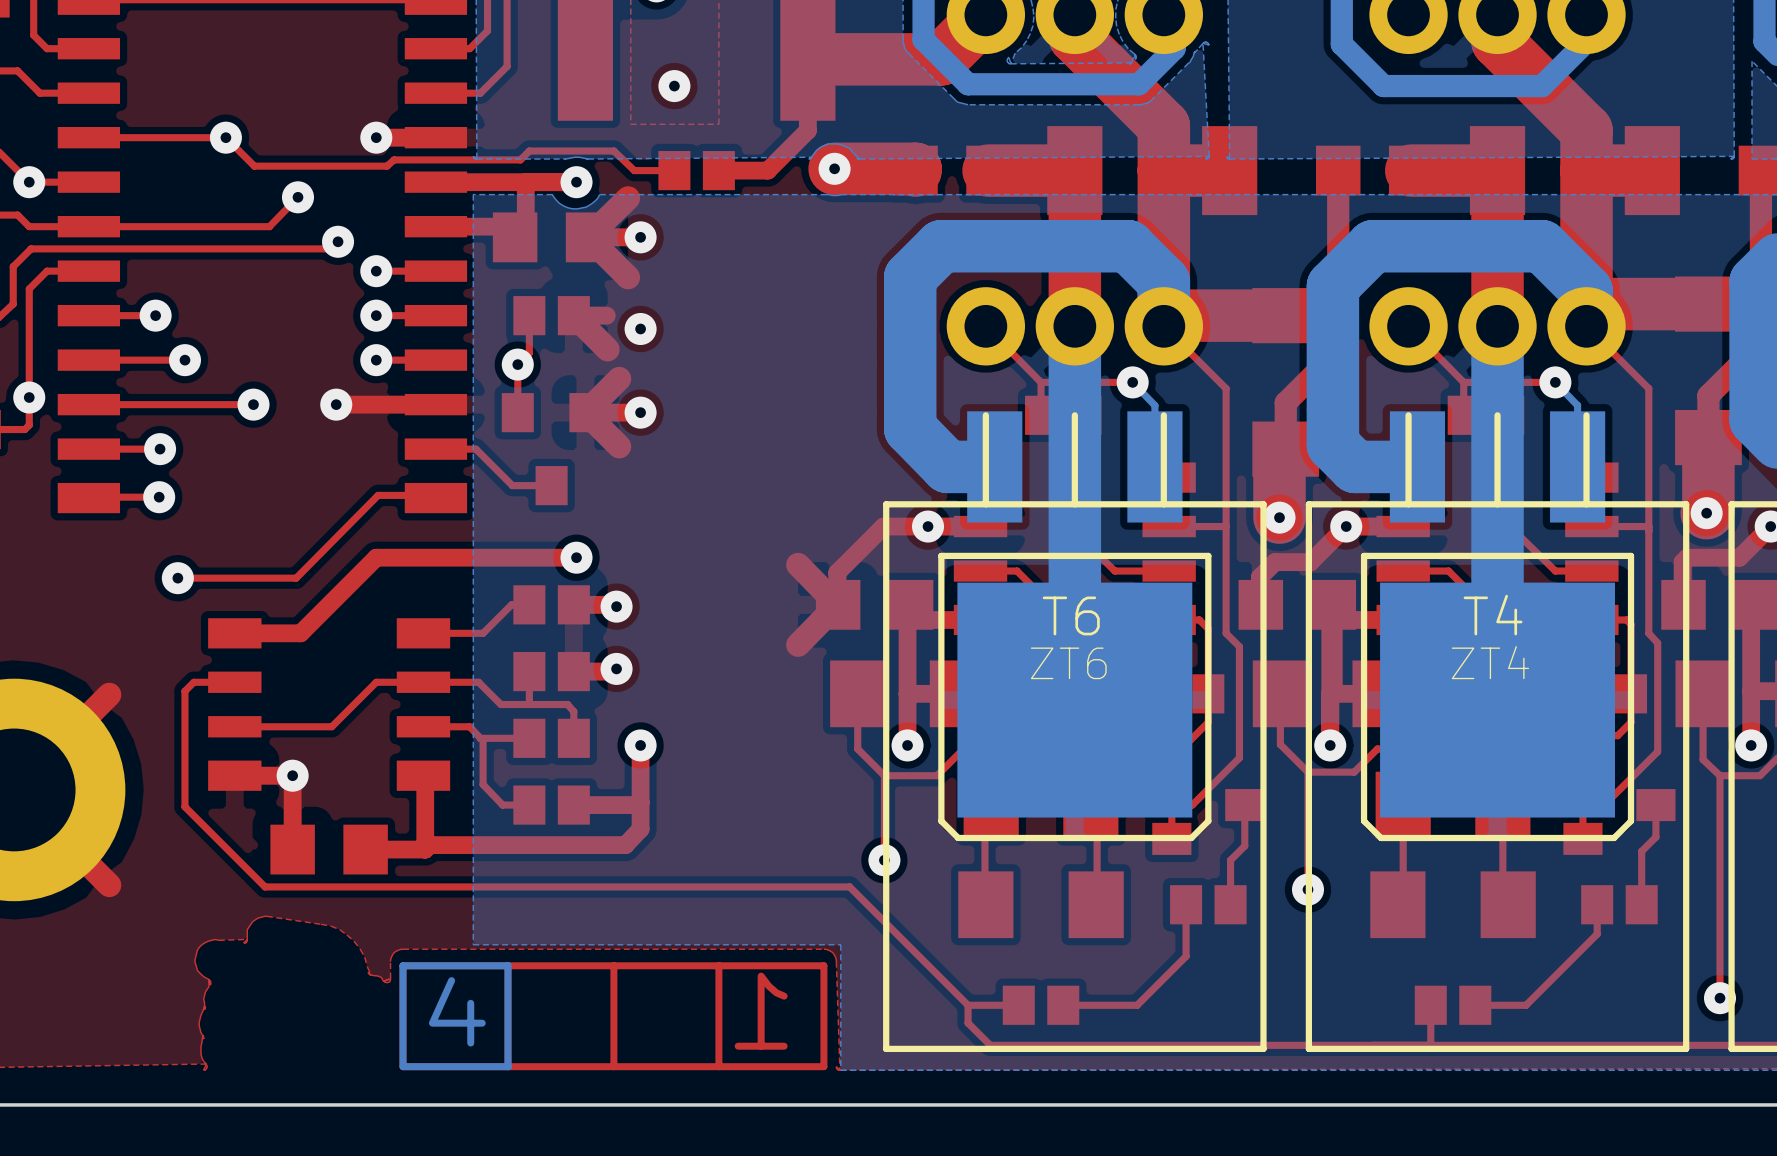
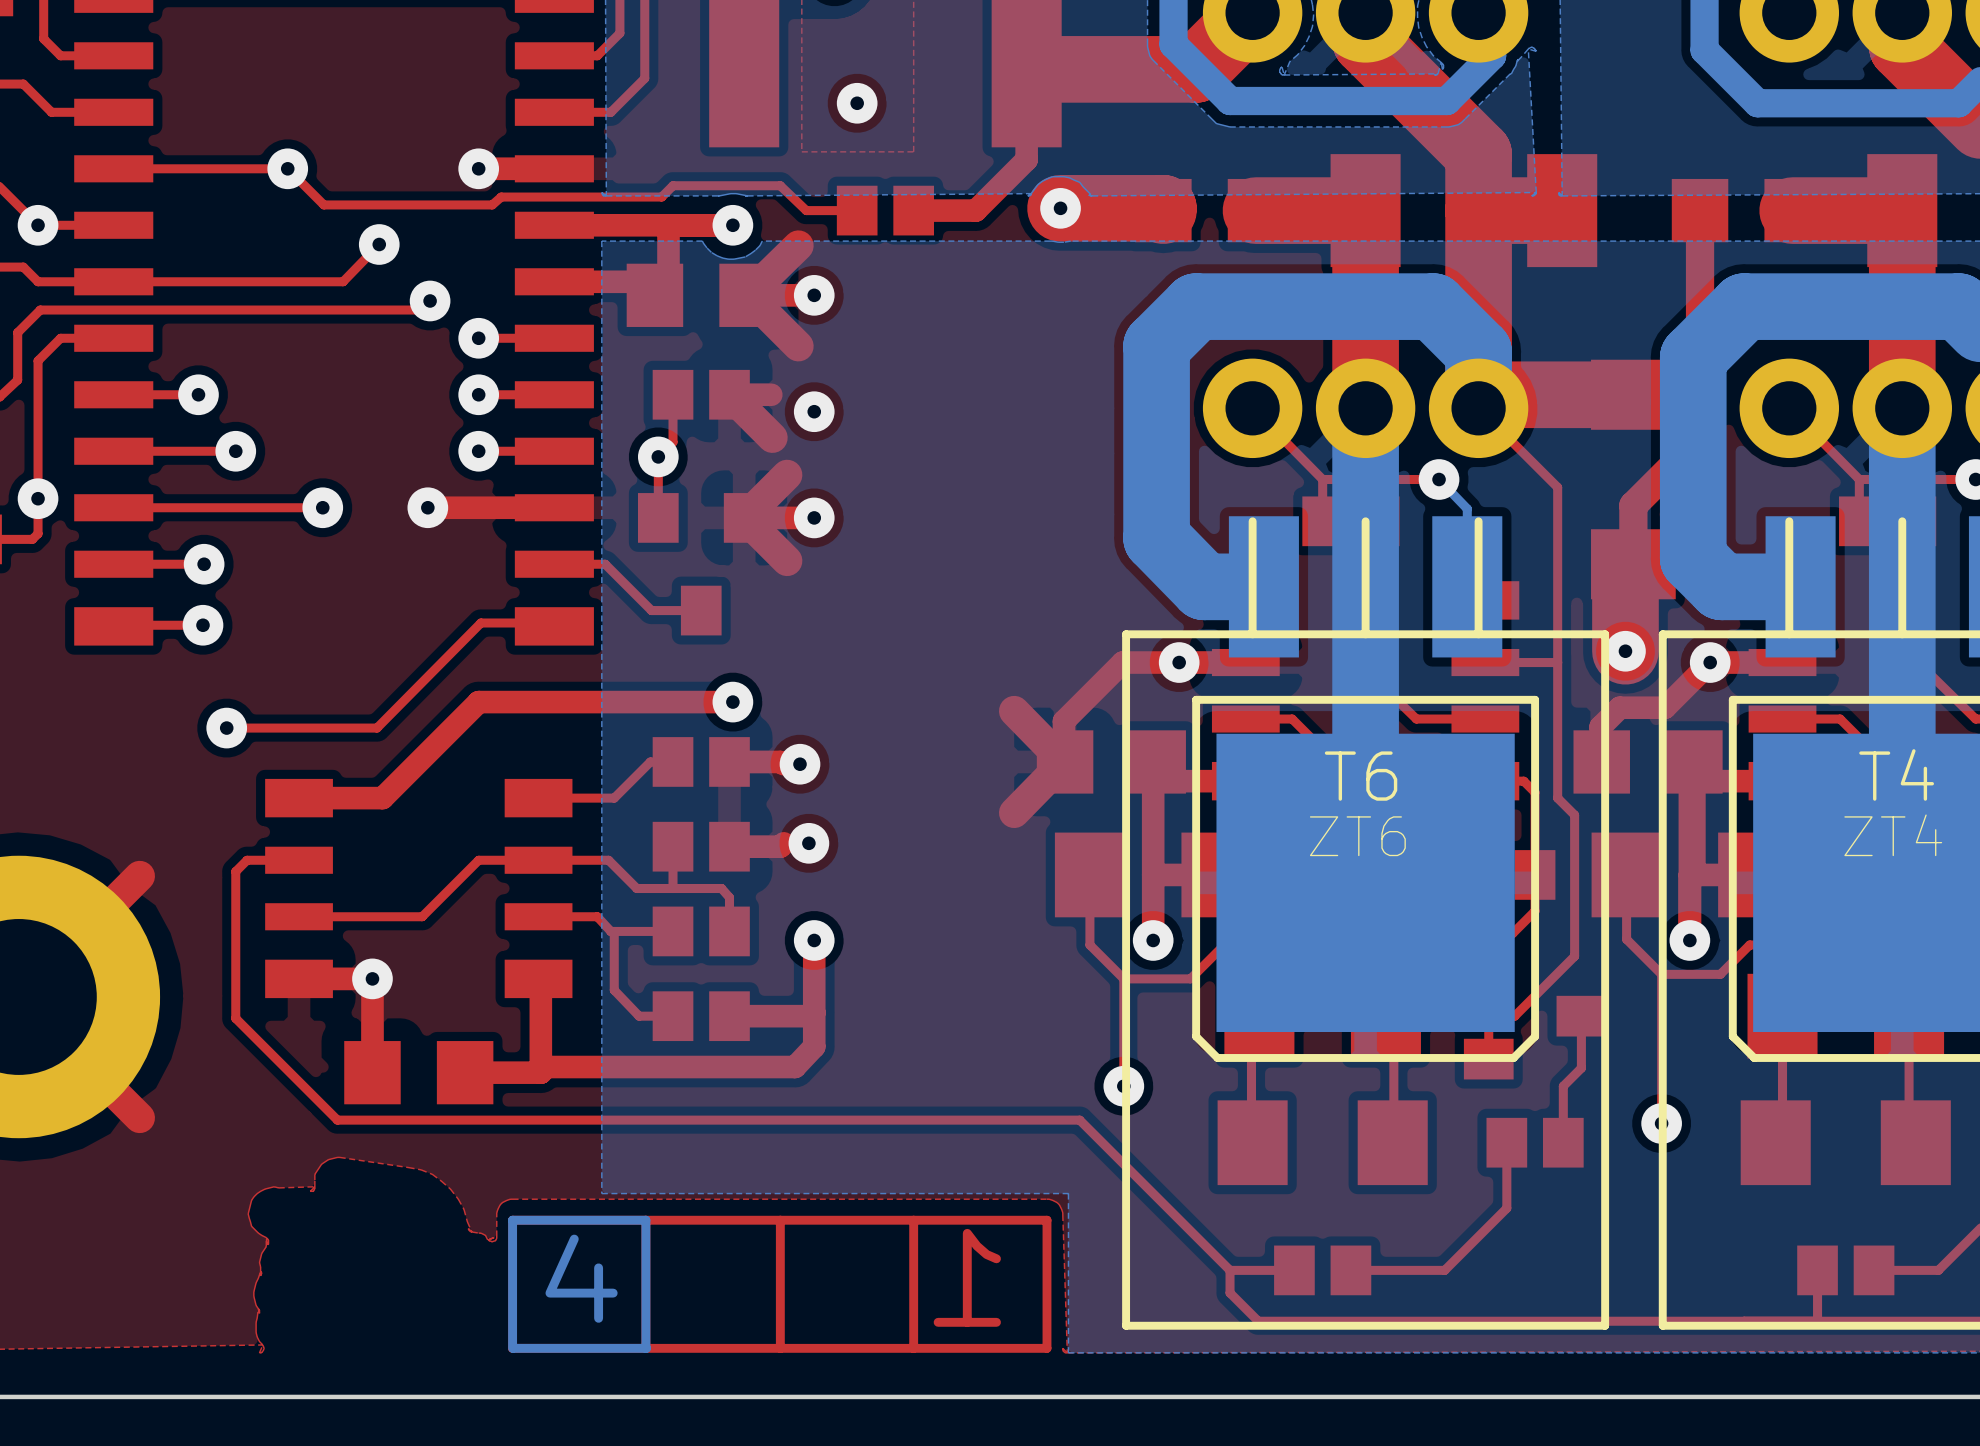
via position: (616, 606) -> (800, 764)
via position: (616, 668) -> (808, 843)

